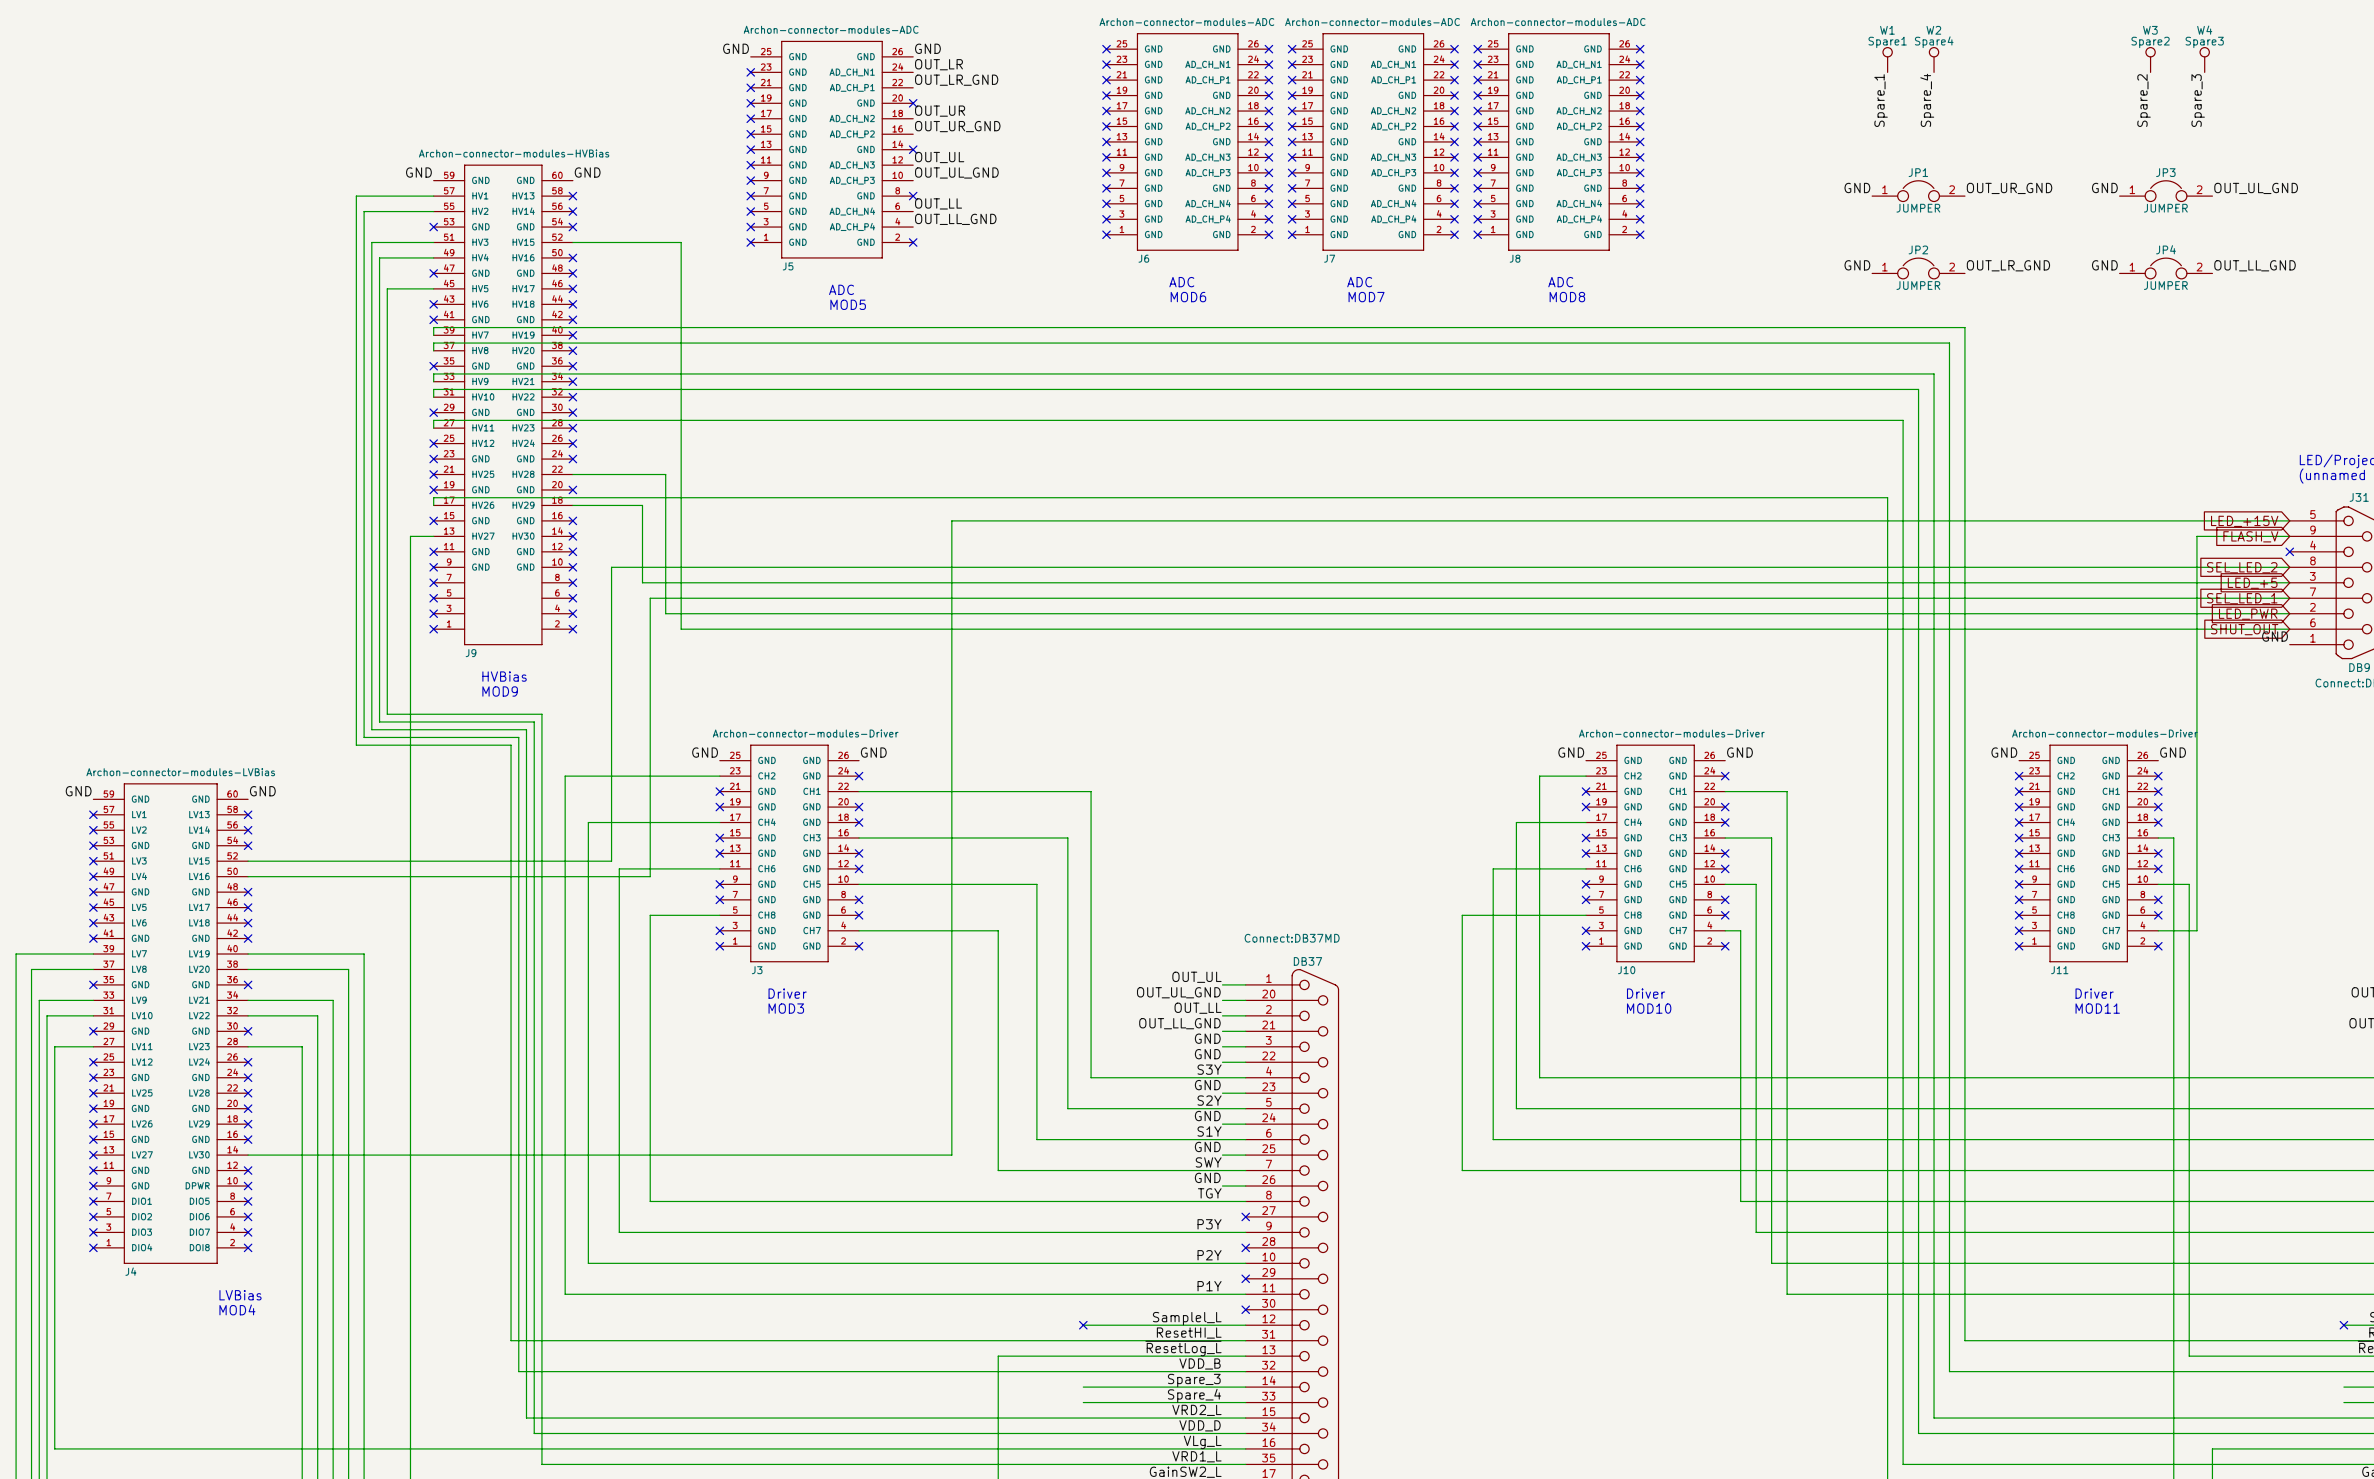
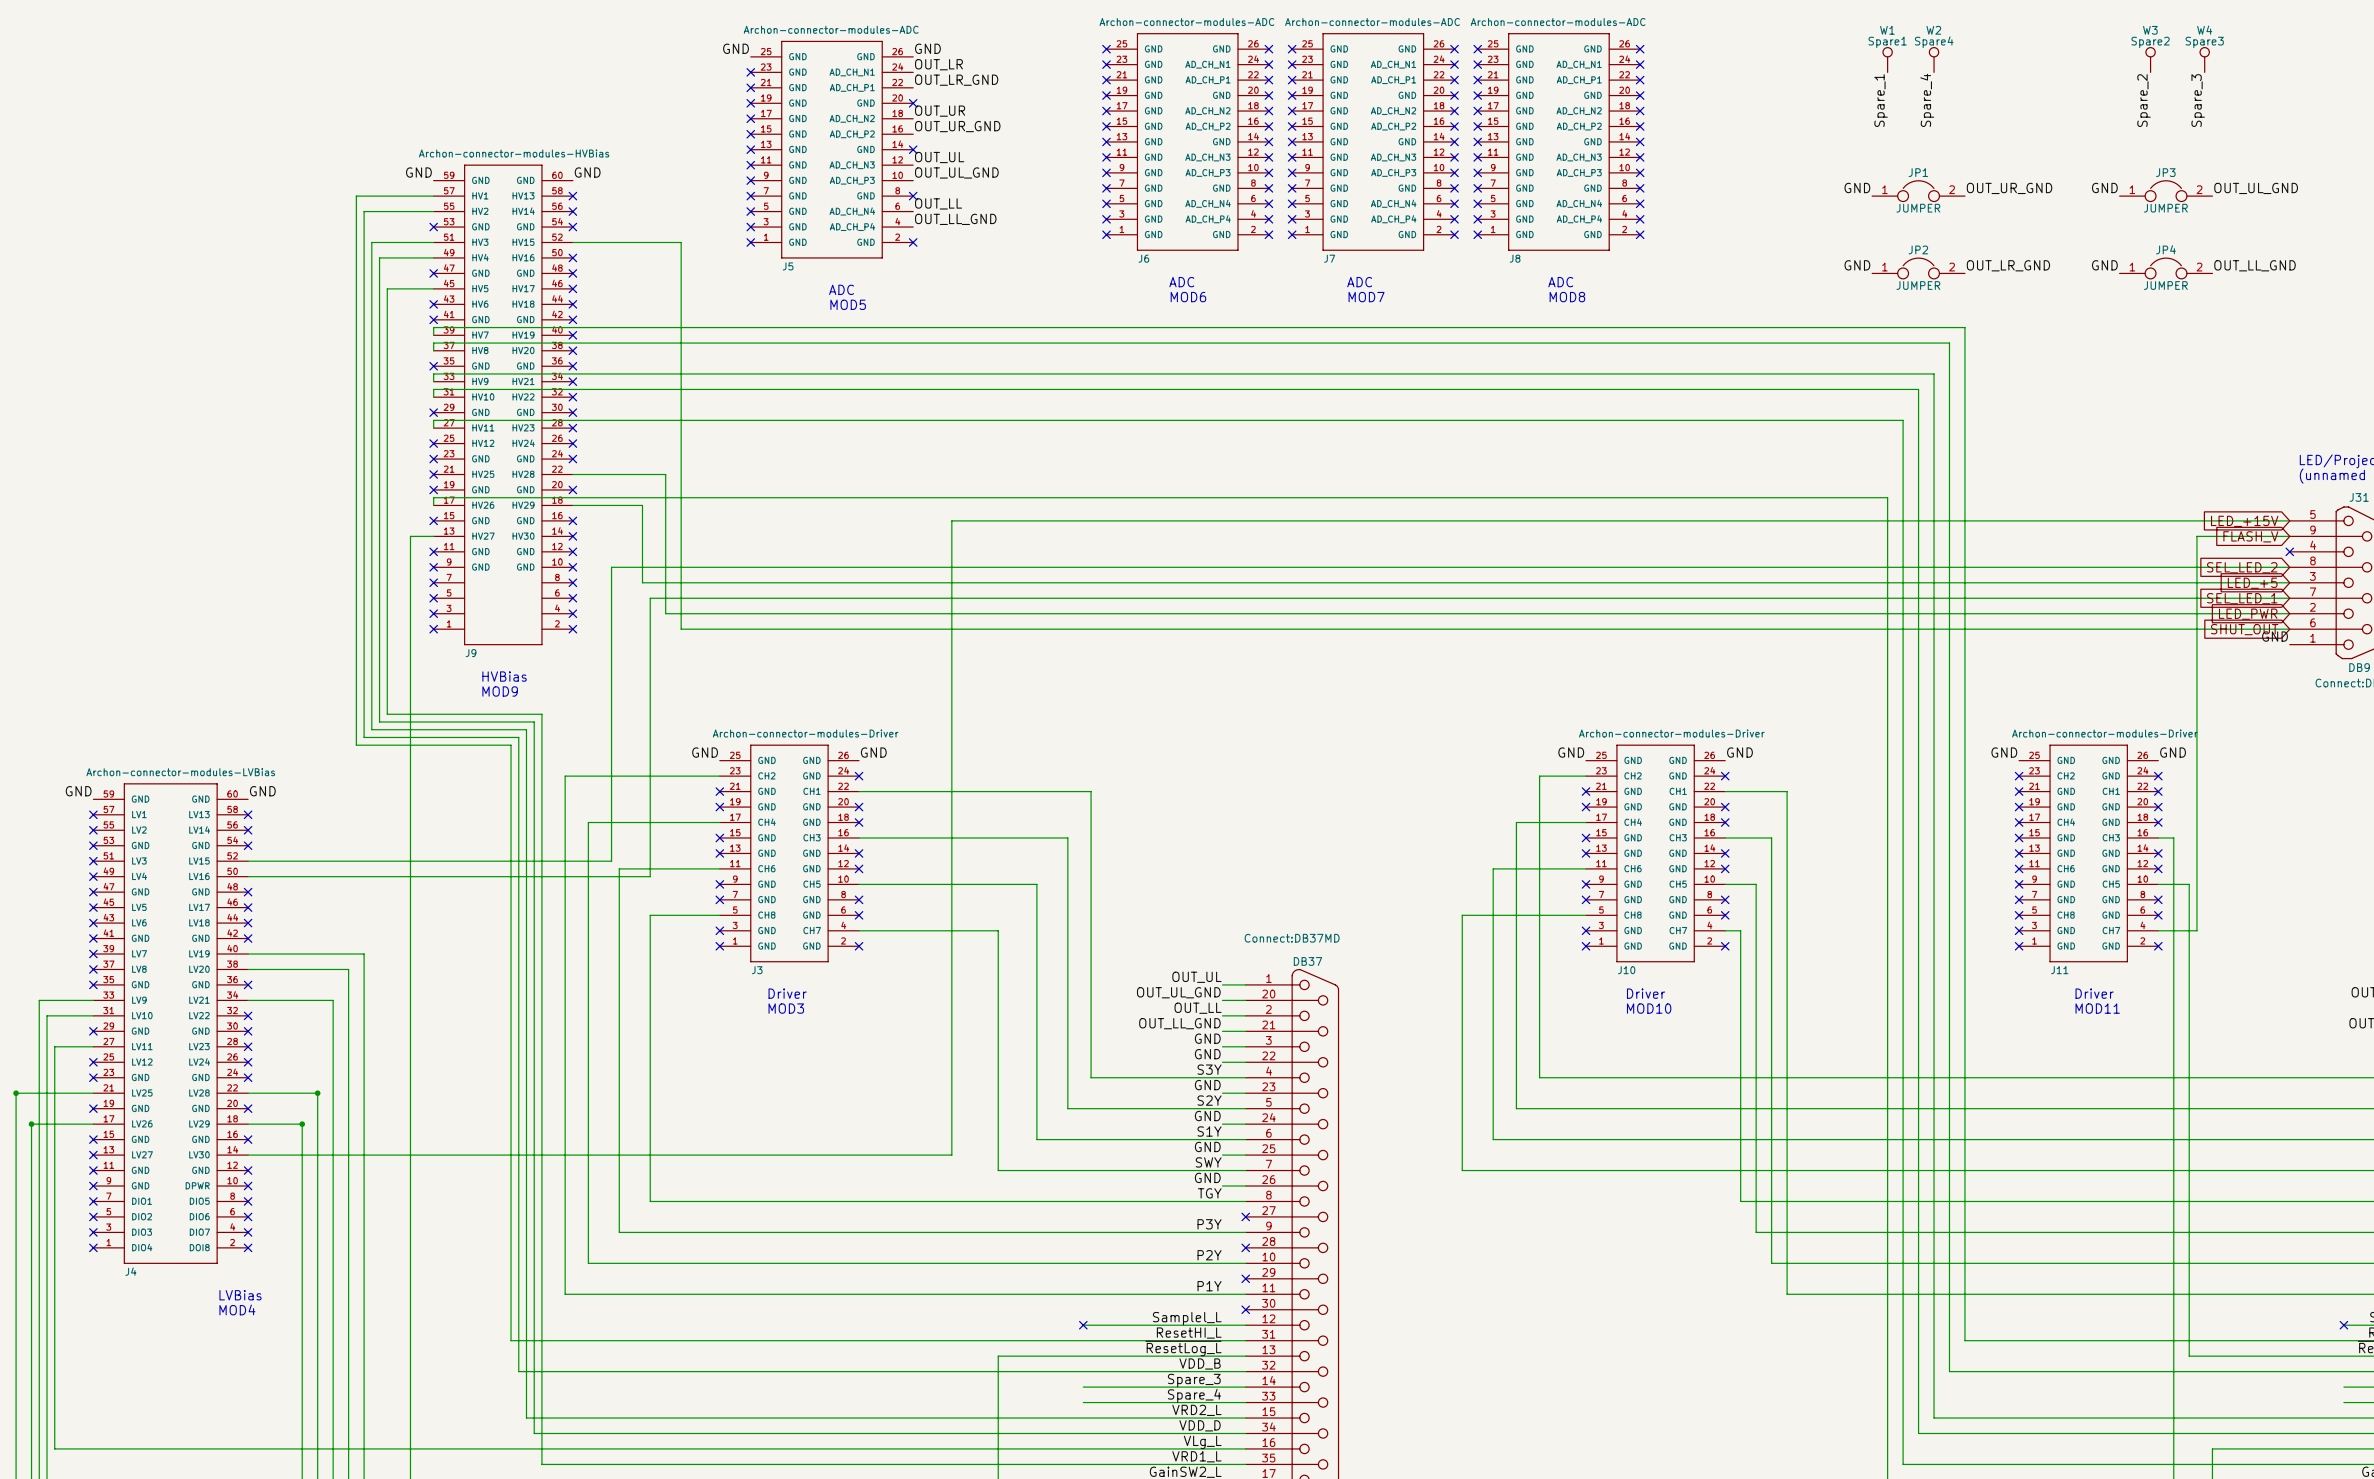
wire: (93, 954) (16, 954) (16, 1093) -> (93, 1093) (16, 1093)
no-connect mark: none -> (93, 954)
wire: (93, 969) (31, 969) (31, 1124) -> (93, 1124) (31, 1124)
no-connect mark: none -> (93, 969)
wire: (248, 1015) (317, 1015) (317, 1093) -> (248, 1093) (317, 1093)
no-connect mark: none -> (248, 1015)
wire: (248, 1046) (302, 1046) (302, 1124) -> (248, 1124) (302, 1124)
no-connect mark: none -> (248, 1046)
junction: none -> (16, 1093)
no-connect mark: (93, 1093) -> none
no-connect mark: (248, 1093) -> none
junction: none -> (317, 1093)
junction: none -> (31, 1124)
no-connect mark: (93, 1124) -> none
no-connect mark: (248, 1124) -> none
junction: none -> (302, 1124)

